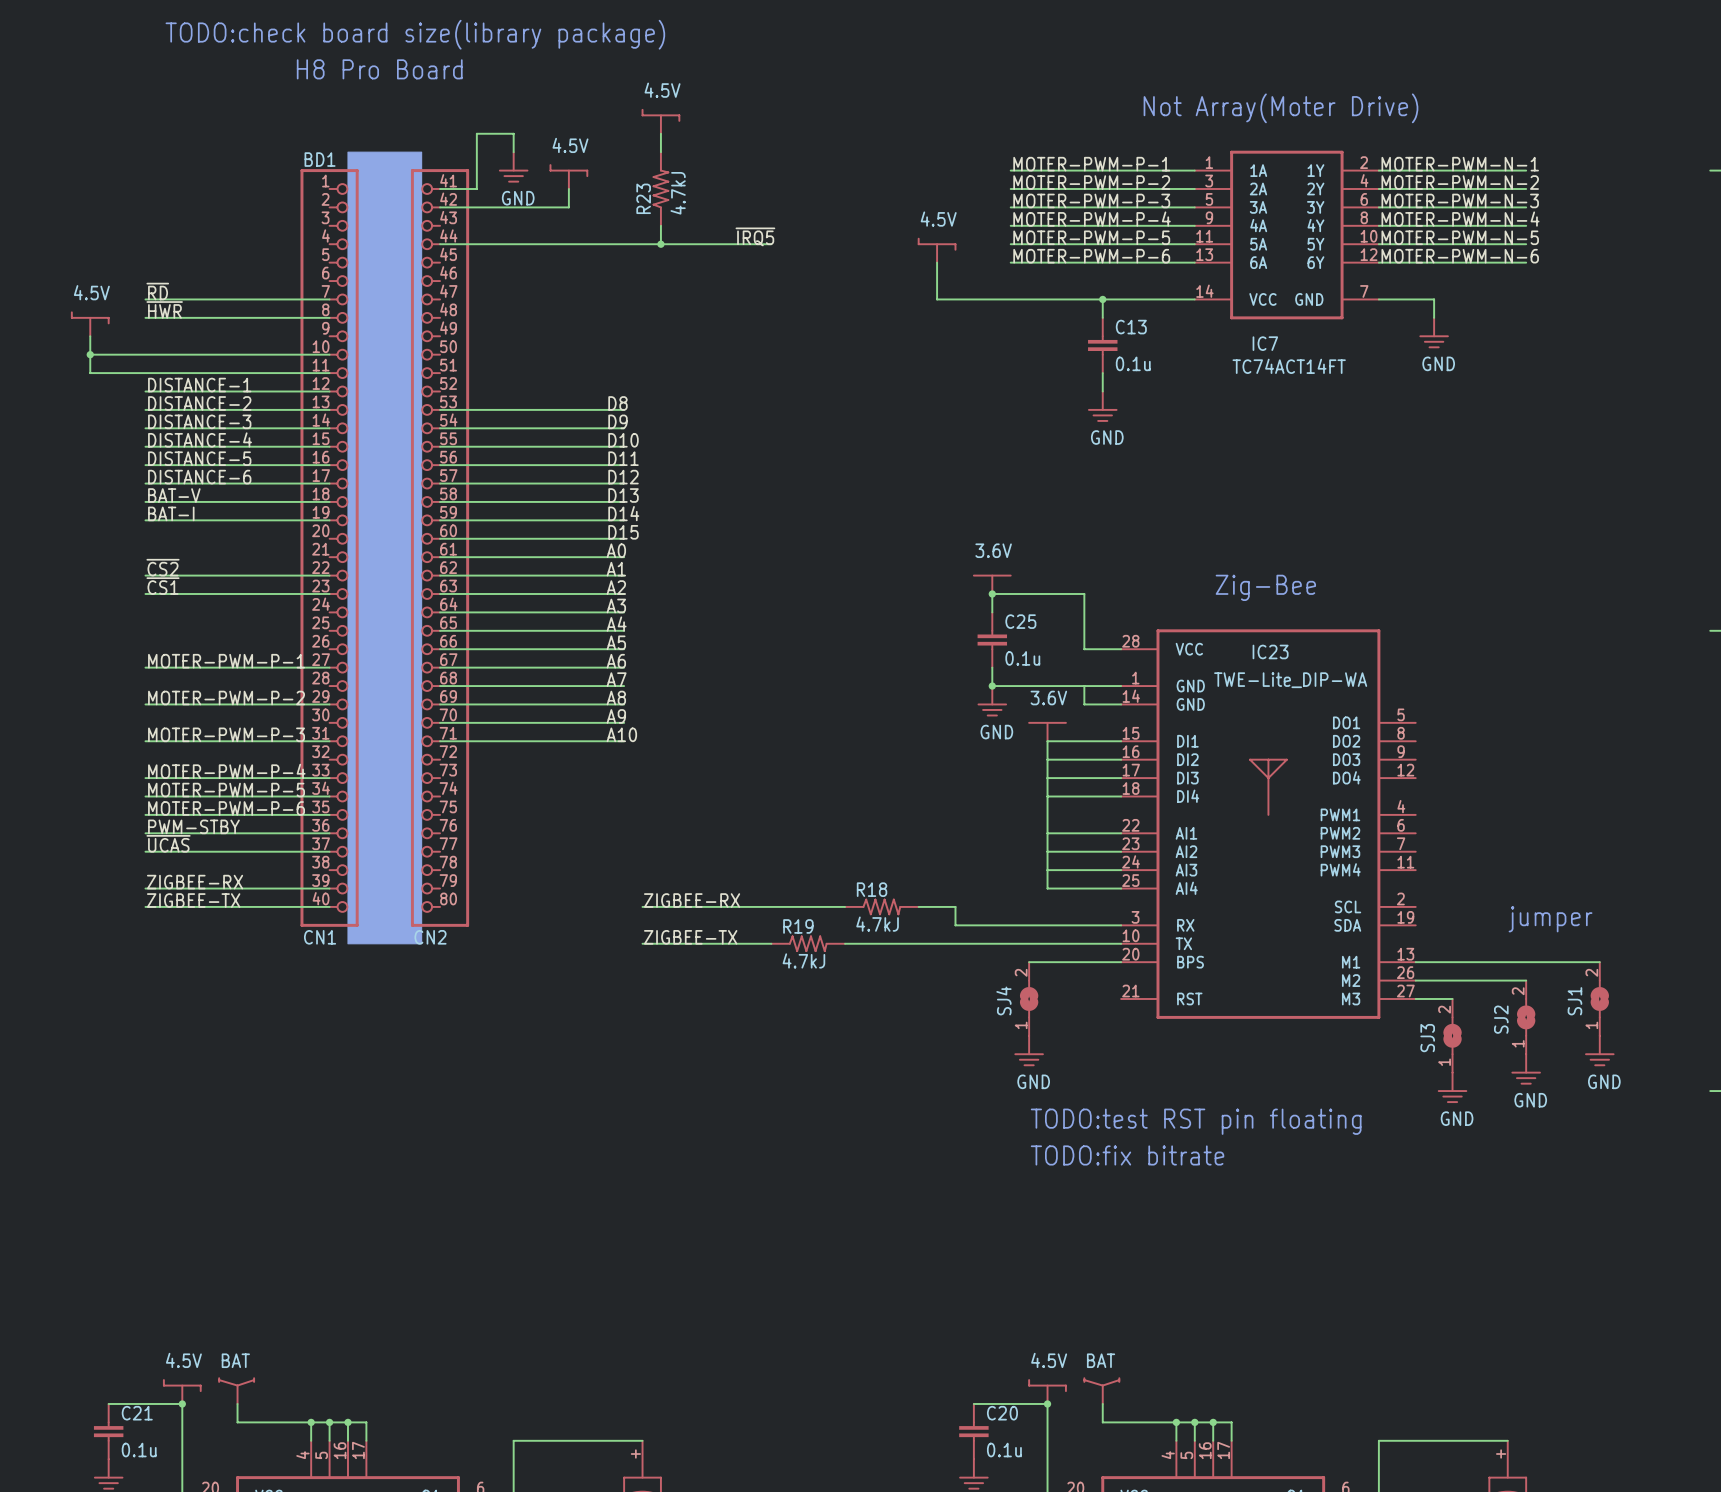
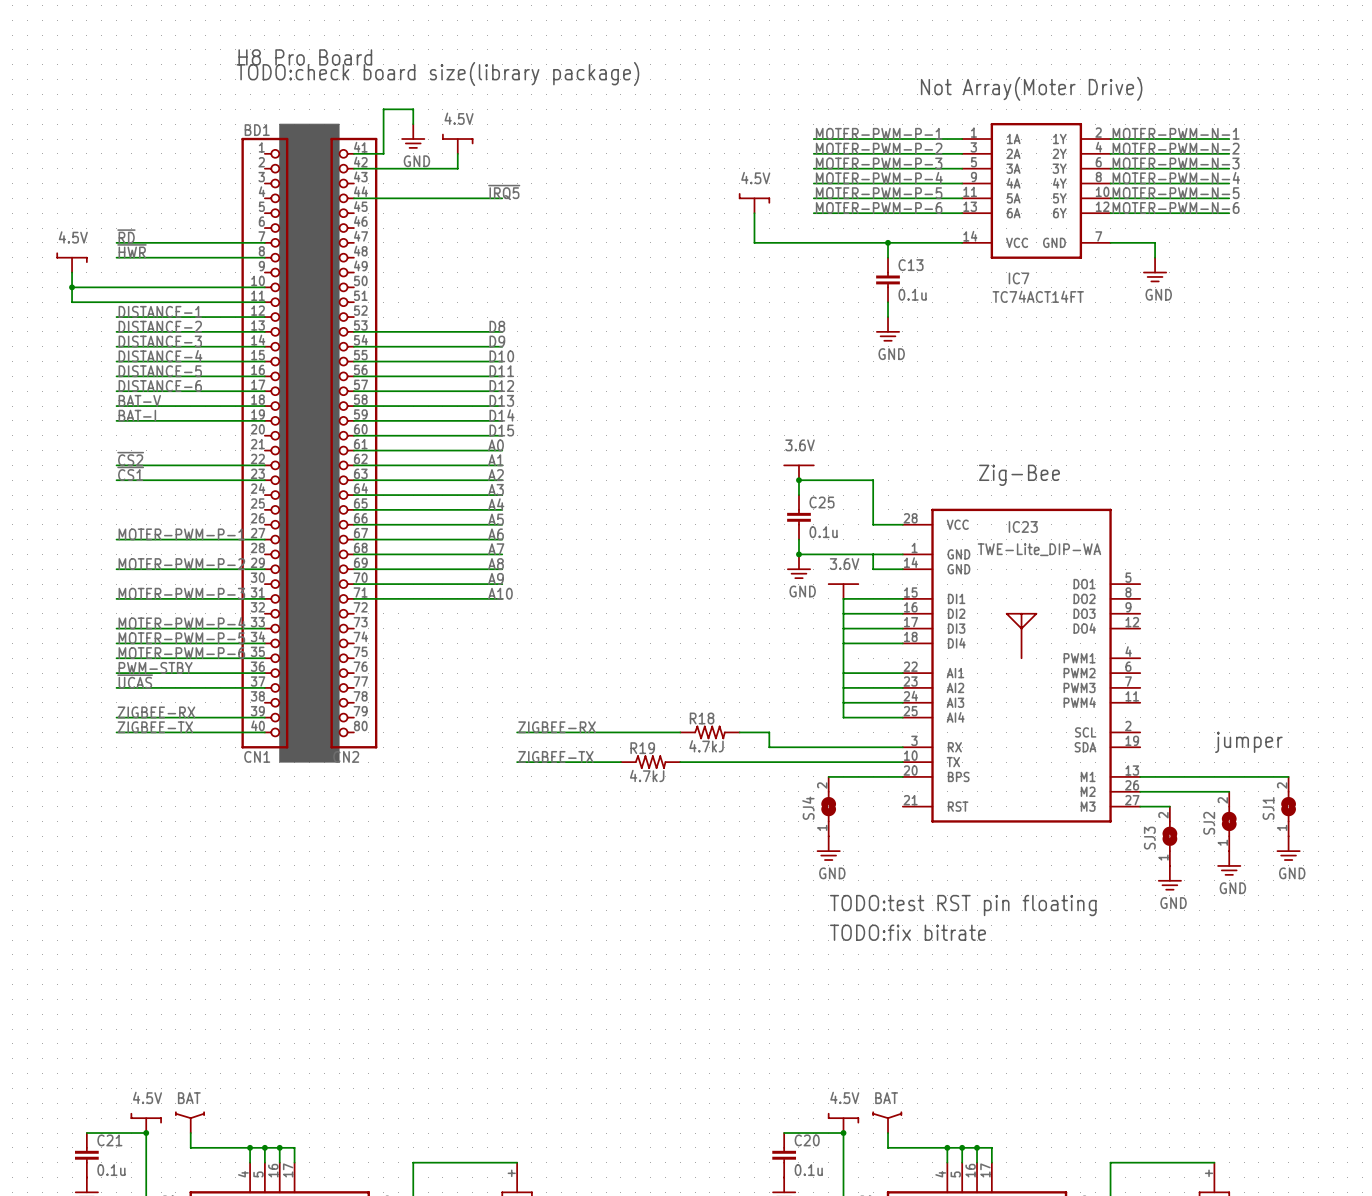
text position: TODO:check board size(library package) (415, 34) -> TODO:check board size(library package) (437, 74)
power symbol: (660, 121) -> none
wire: (660, 133) (660, 152) -> none
R23: 4.7kJ (660, 189) -> none
wire: (660, 225) (660, 244) -> none
label position: ~{IRQ5} (755, 236) -> ~{IRQ5} (504, 192)
wire: (624, 244) (771, 244) -> none
junction: (660, 244) -> none

